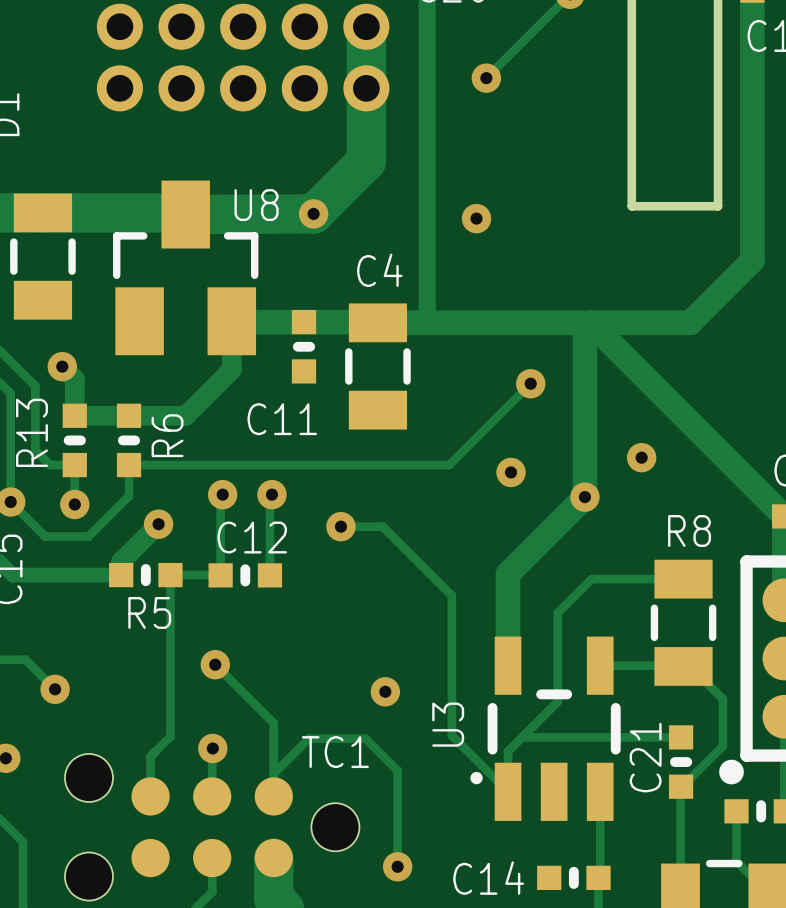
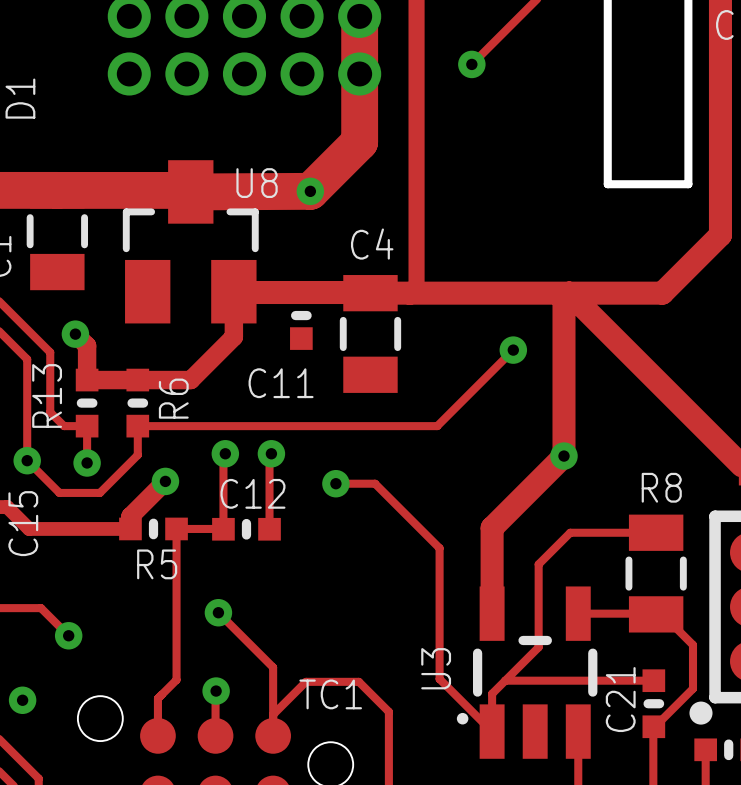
via: (476, 218) -> none
via: (641, 457) -> none
via: (511, 472) -> none
via: (385, 691) -> none

